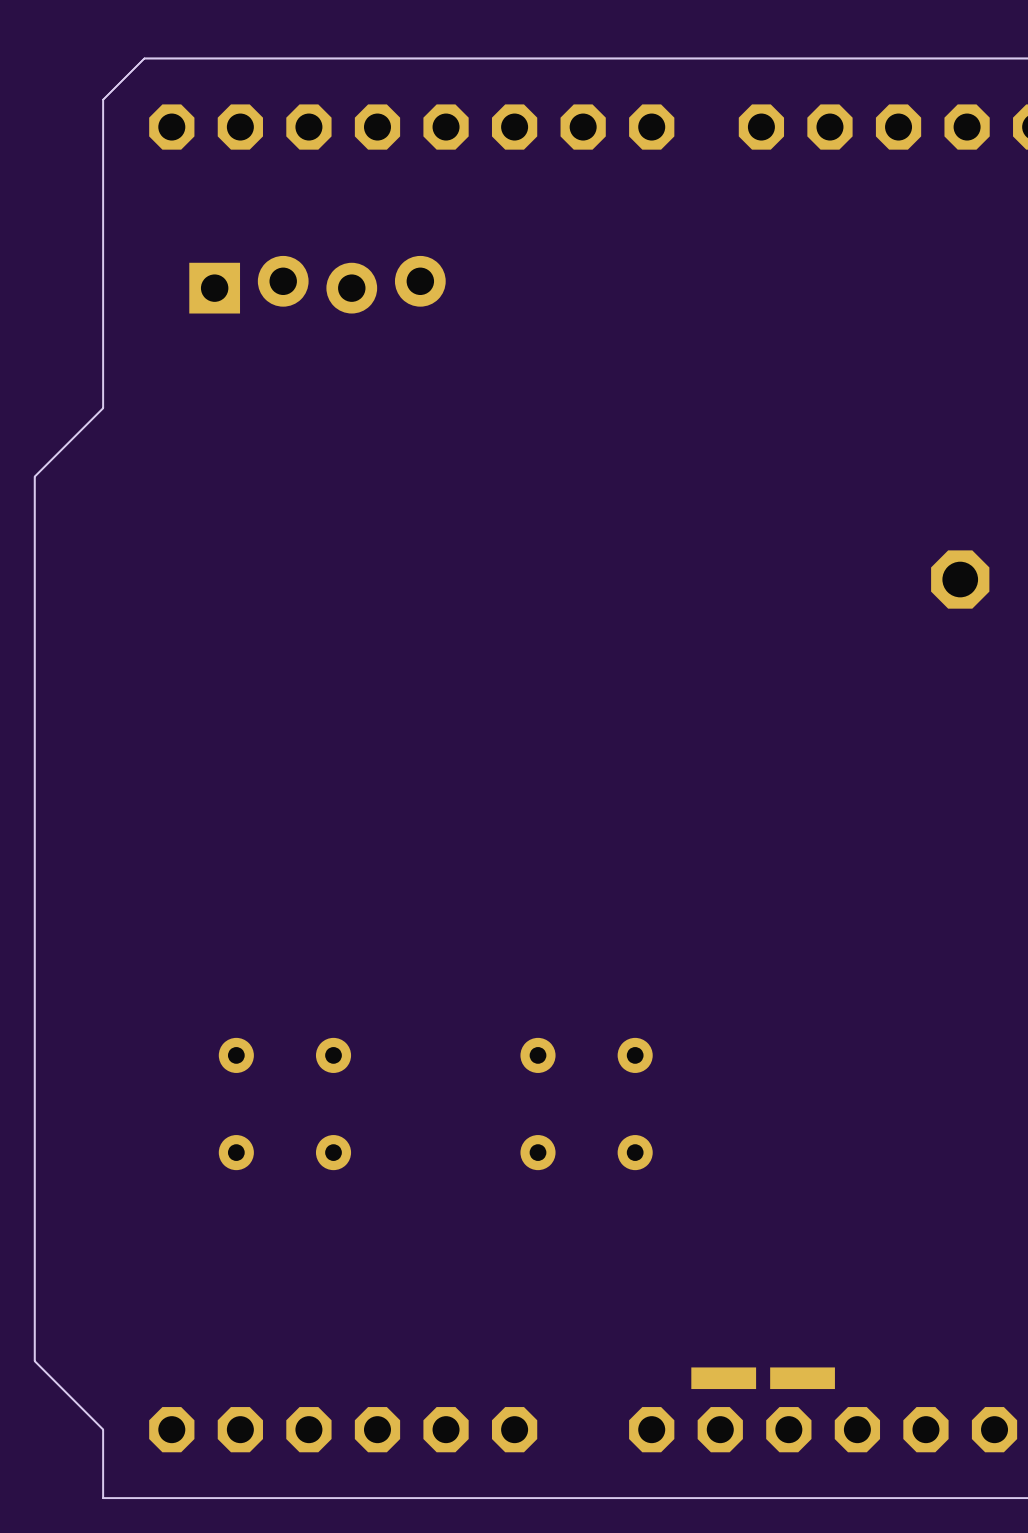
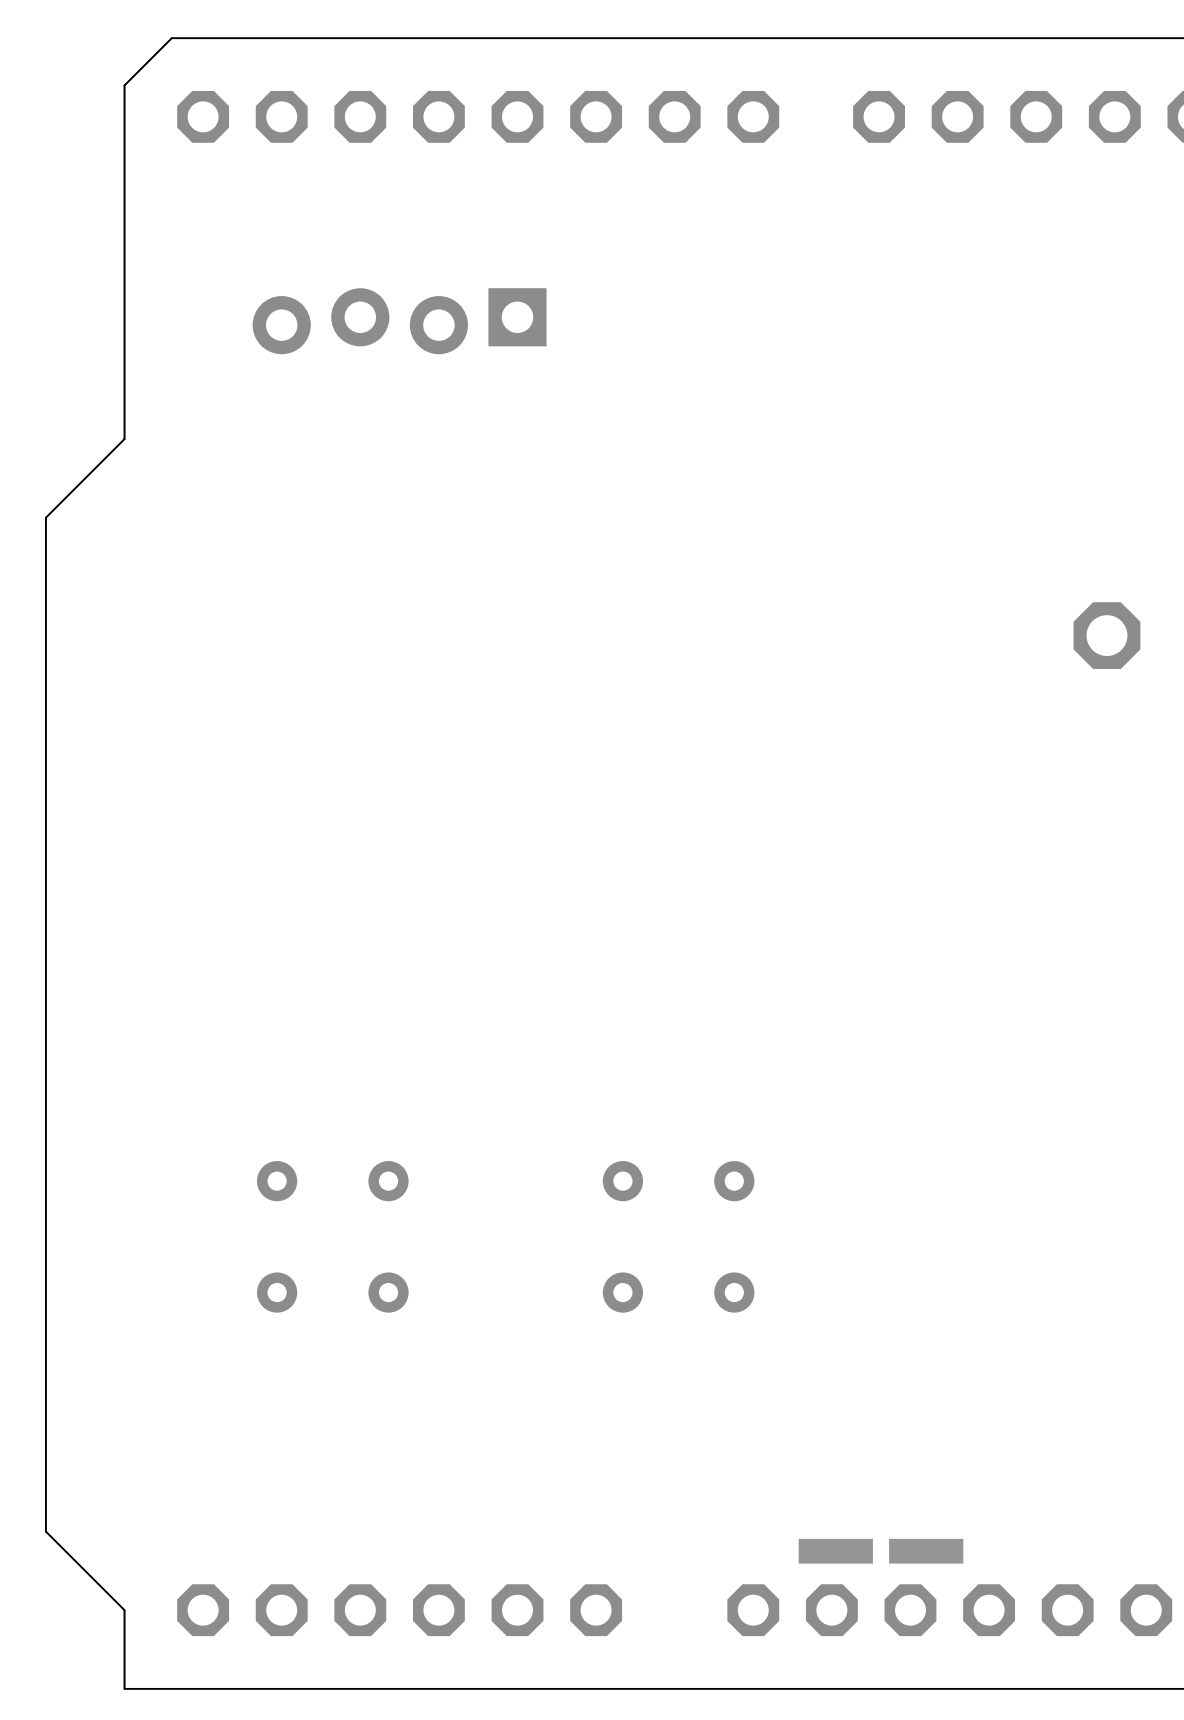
part rotation: 0° (317, 284) -> 180° (399, 321)

